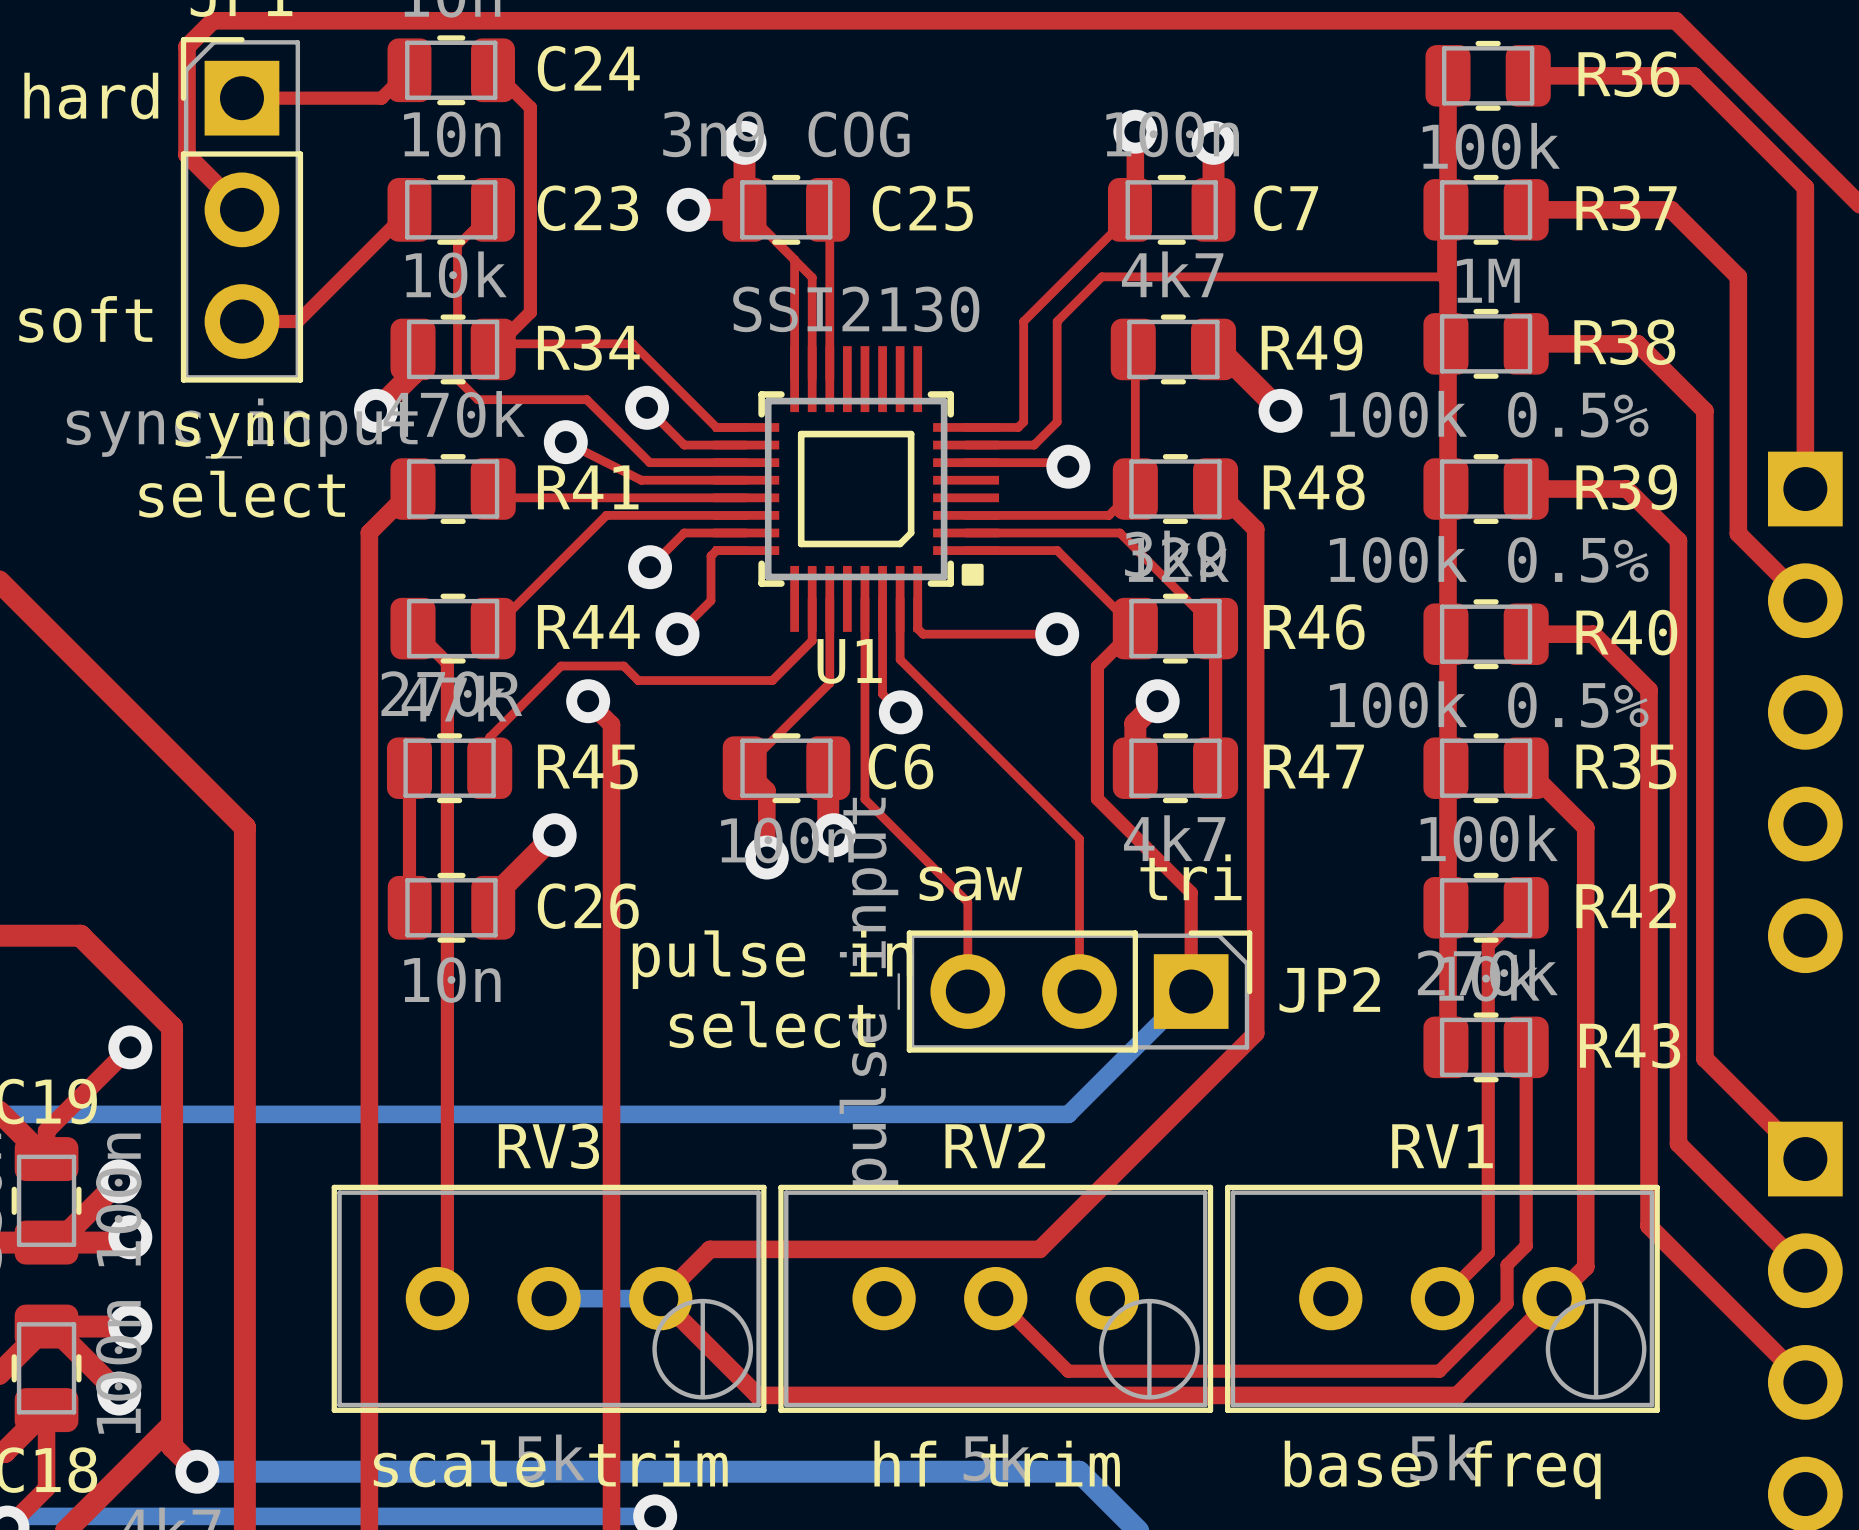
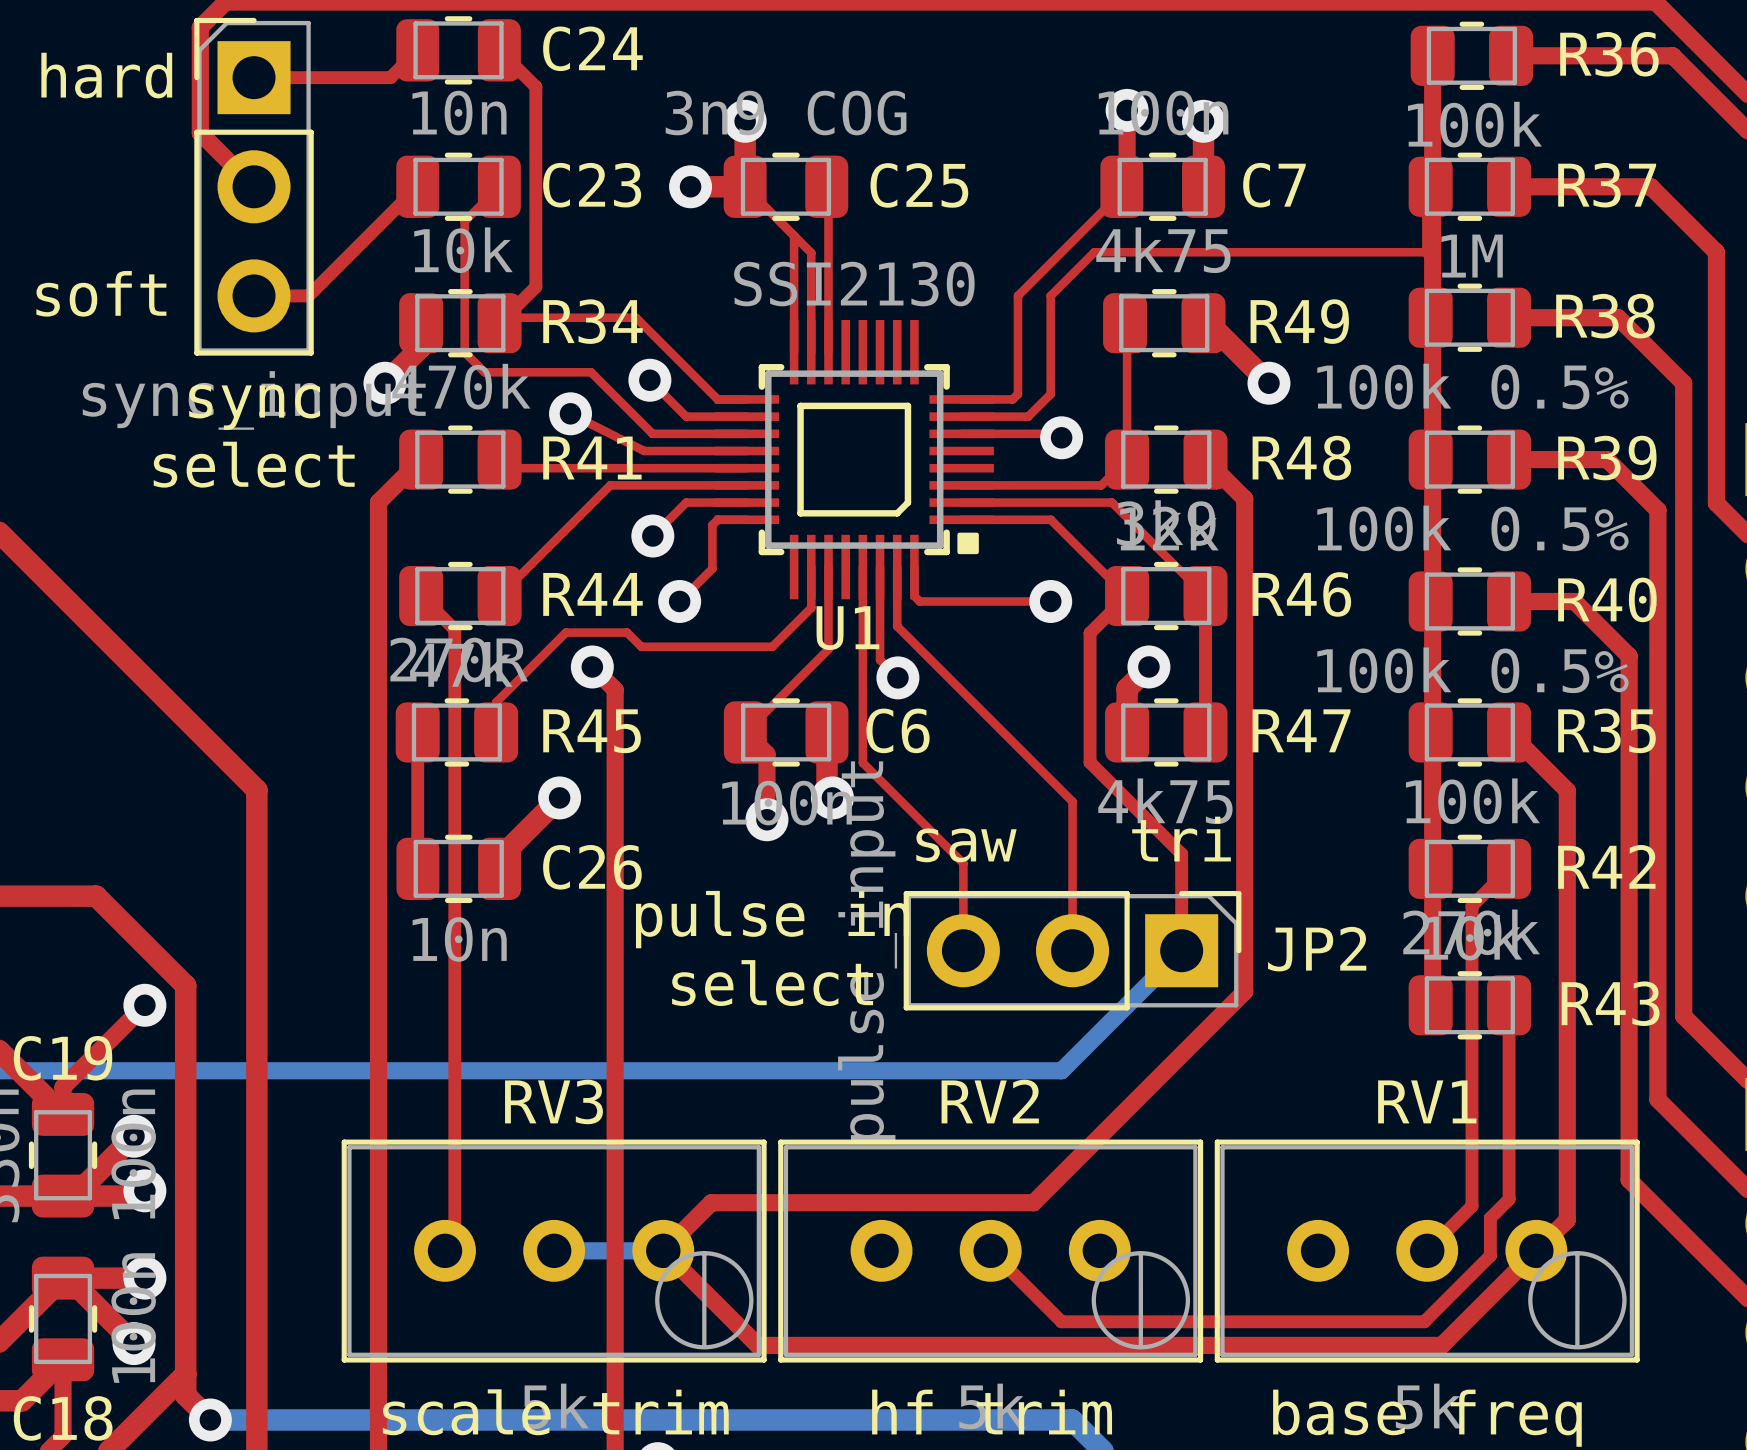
R49 value: 4k7 (1172, 274) -> 4k75 (1163, 250)
R47 value: 4k7 (1174, 838) -> 4k75 (1165, 801)

